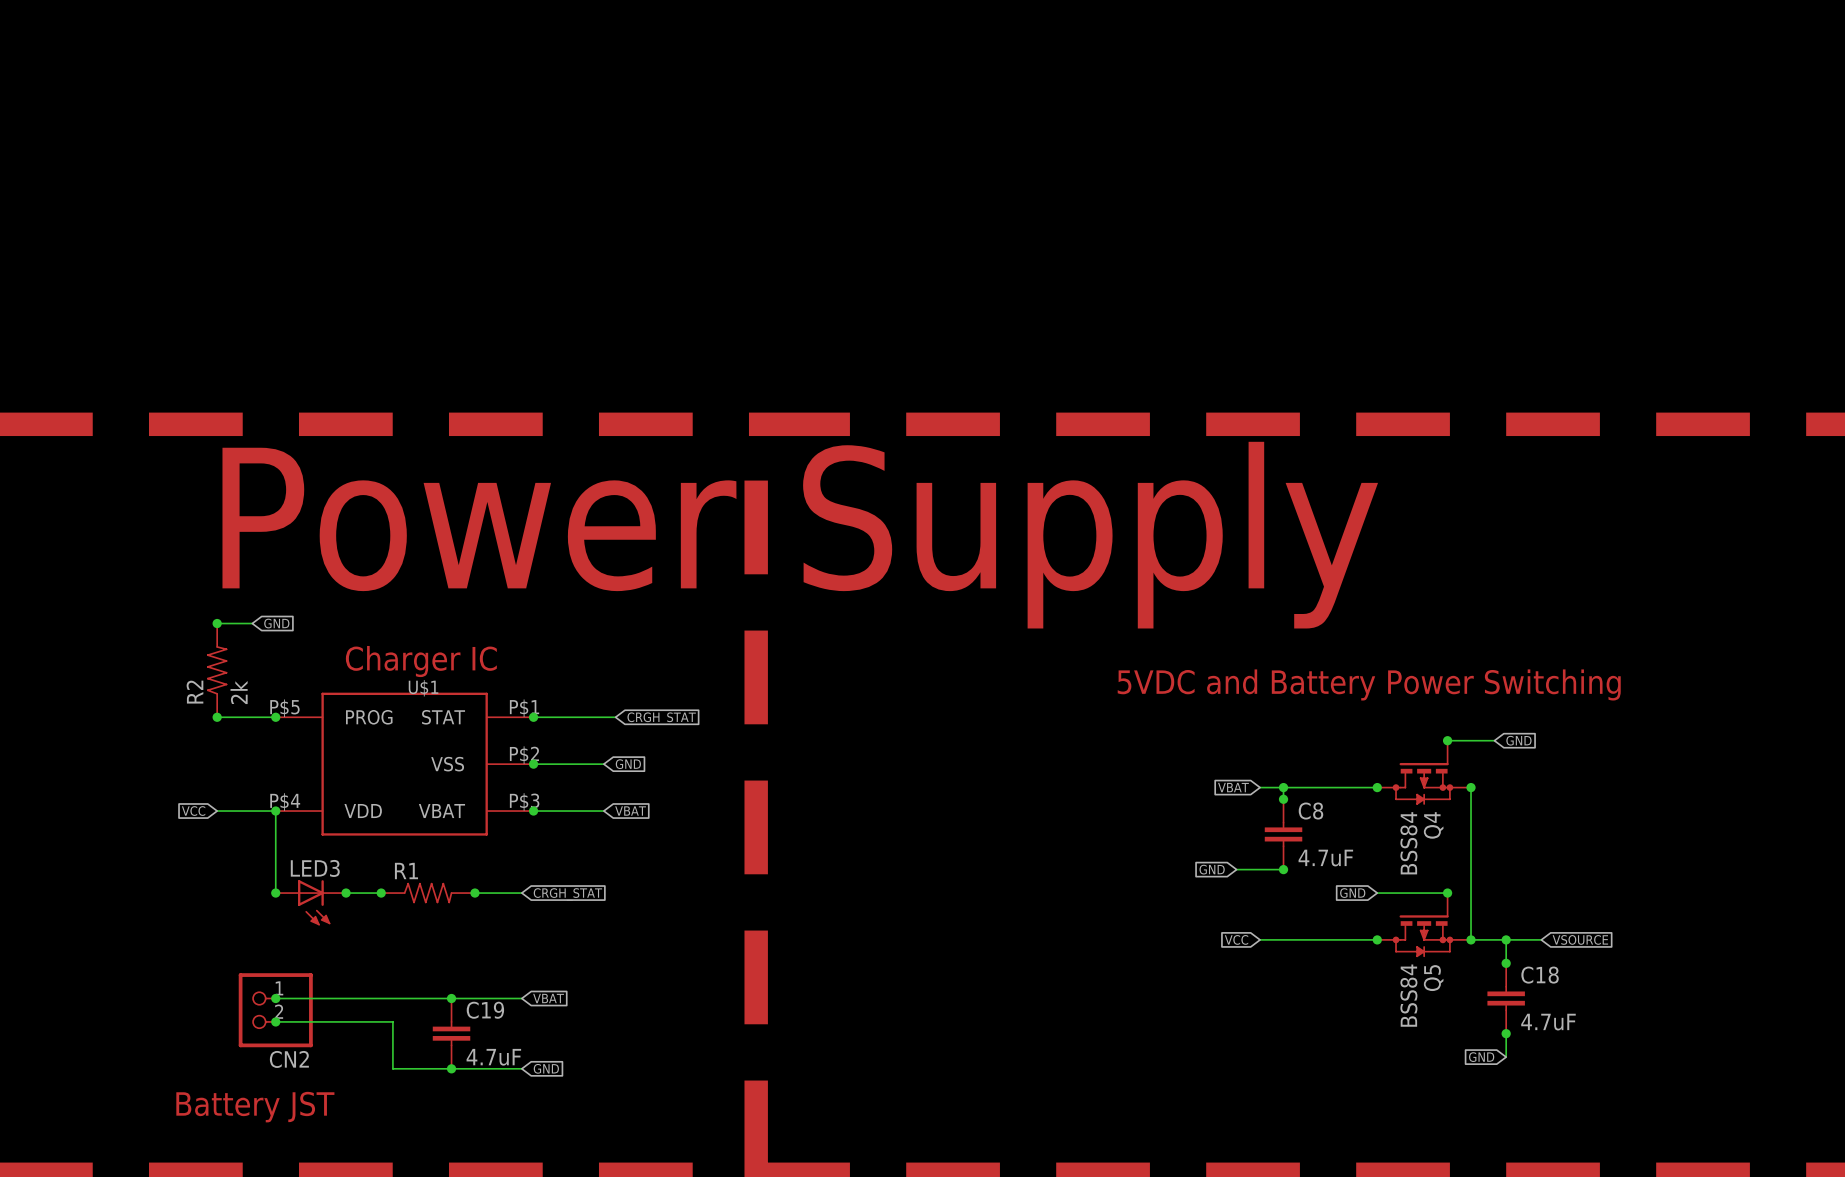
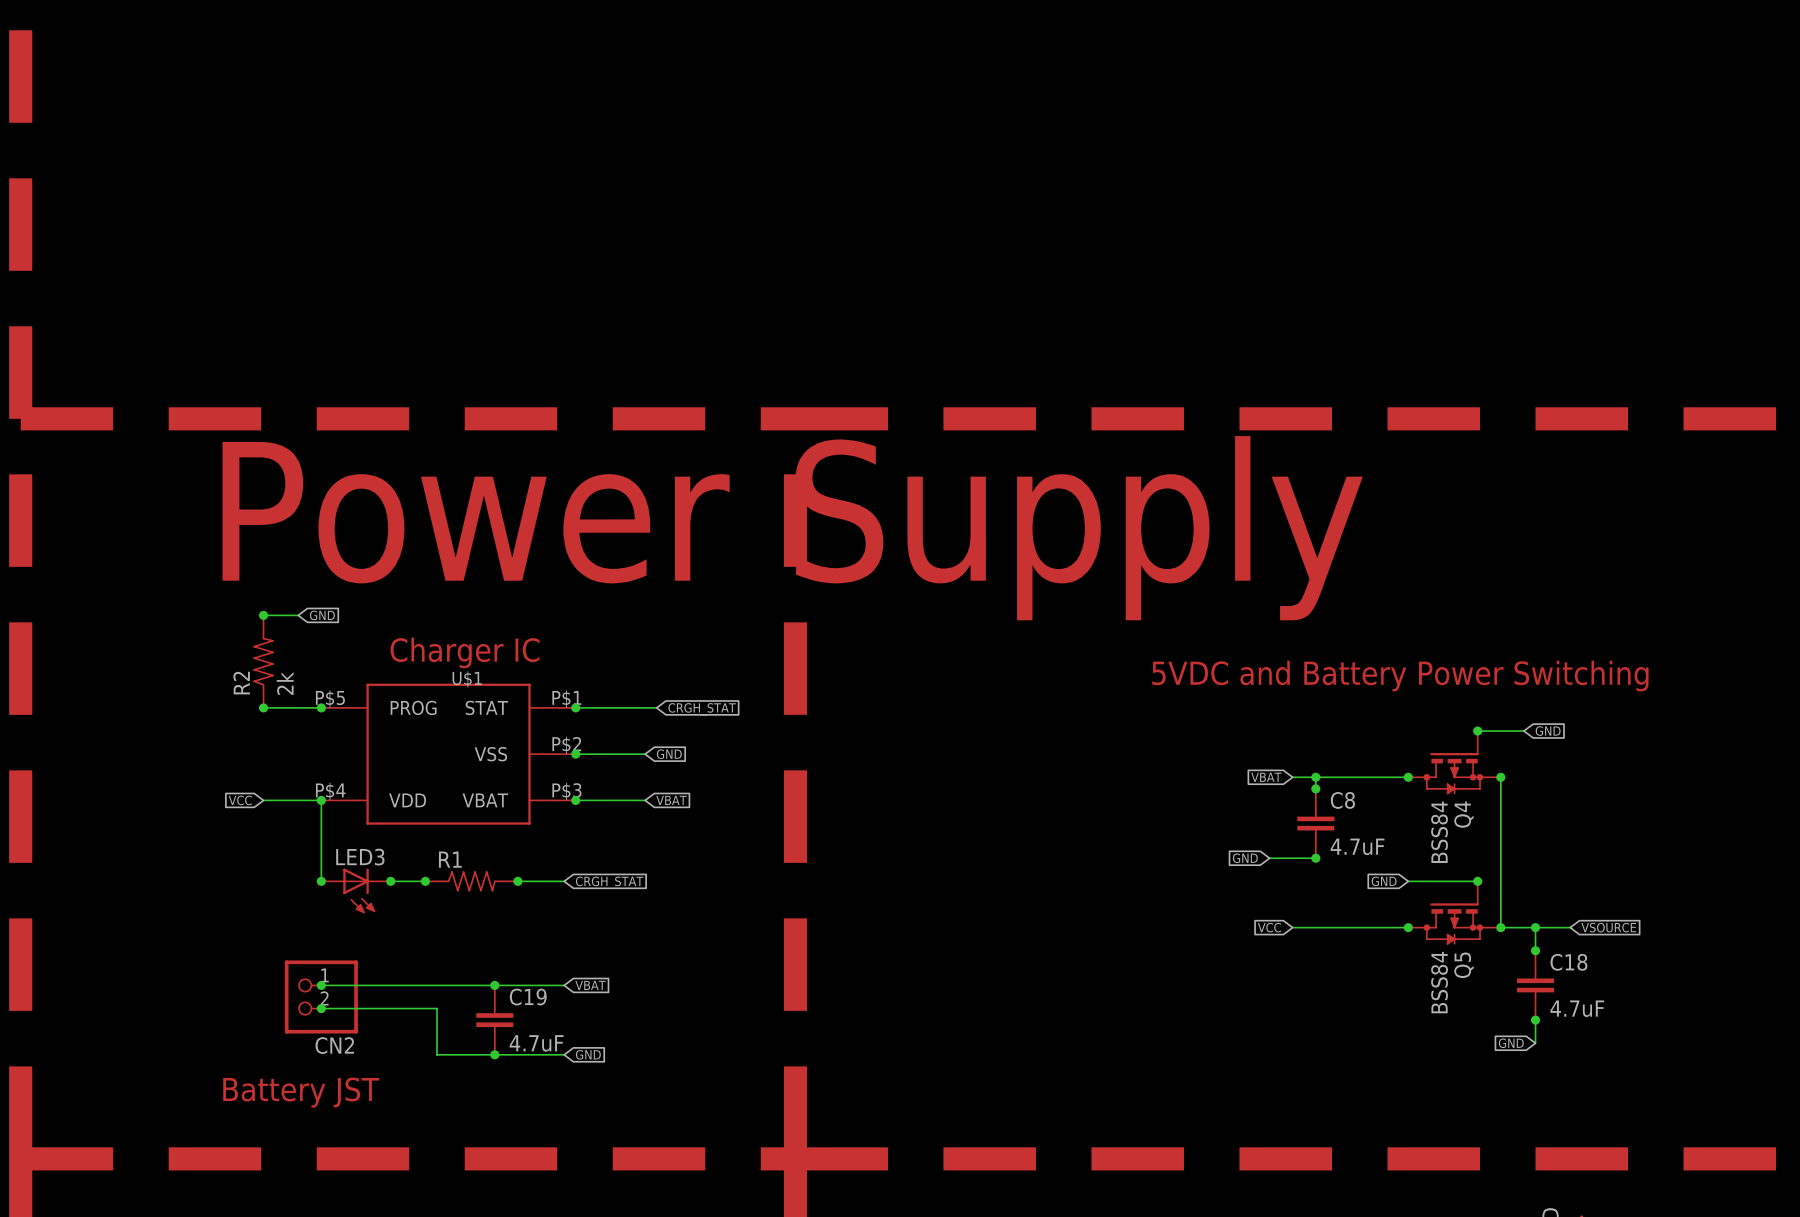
text position: Power Supply (800, 535) -> Power Supply (792, 528)

